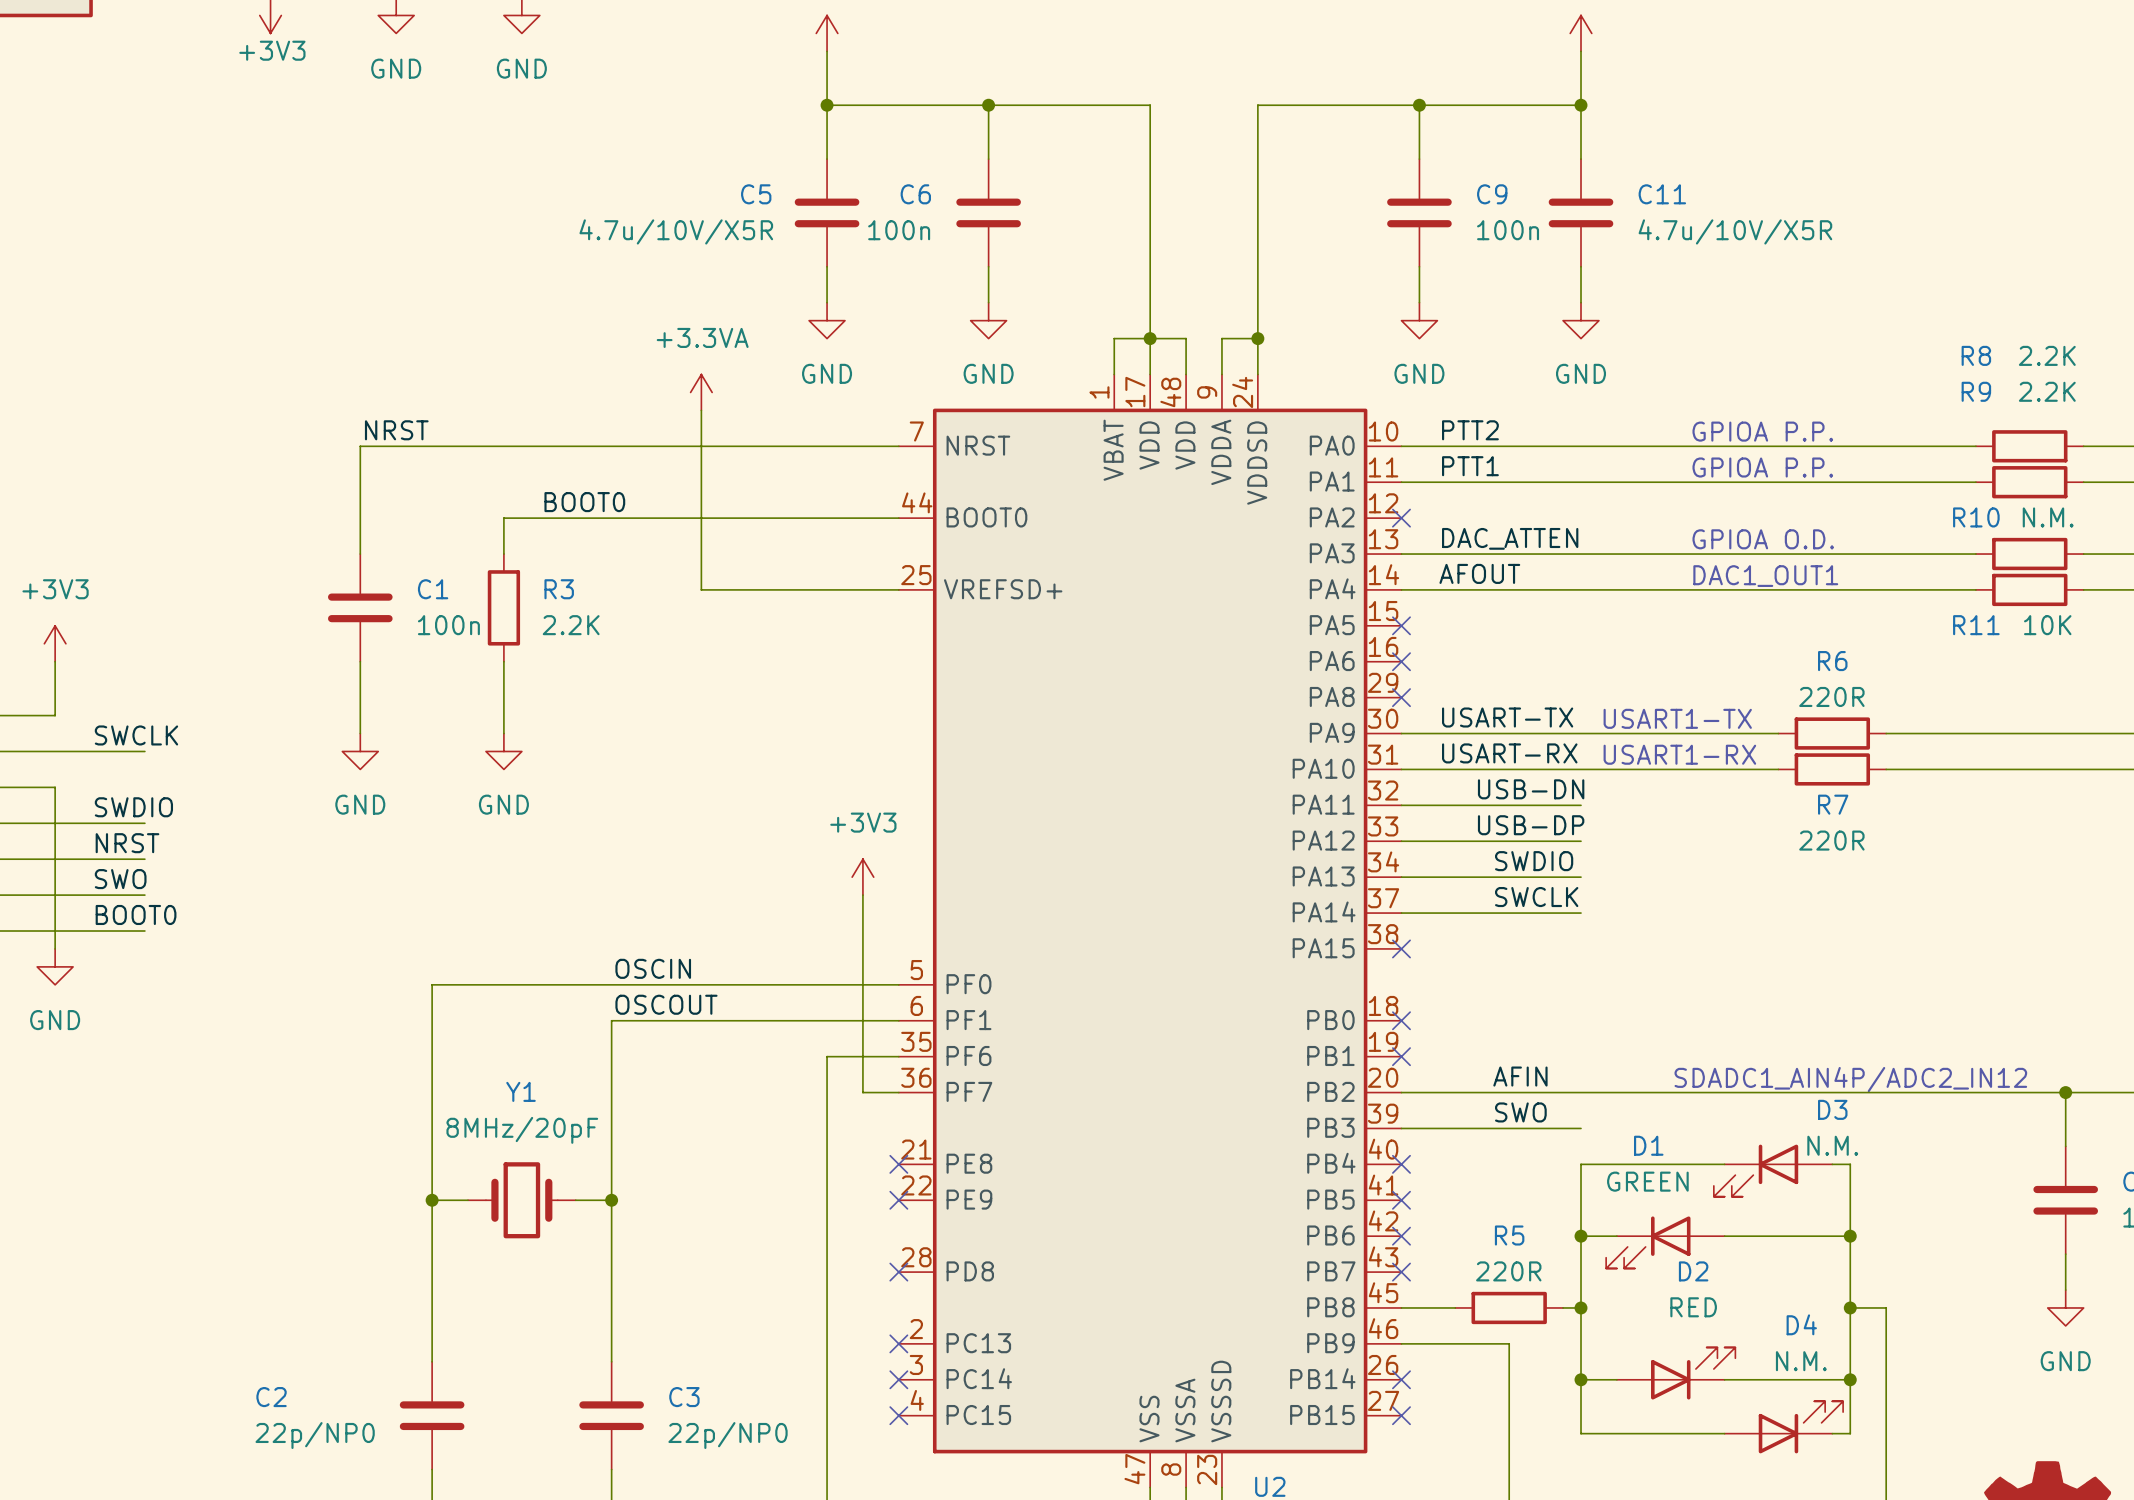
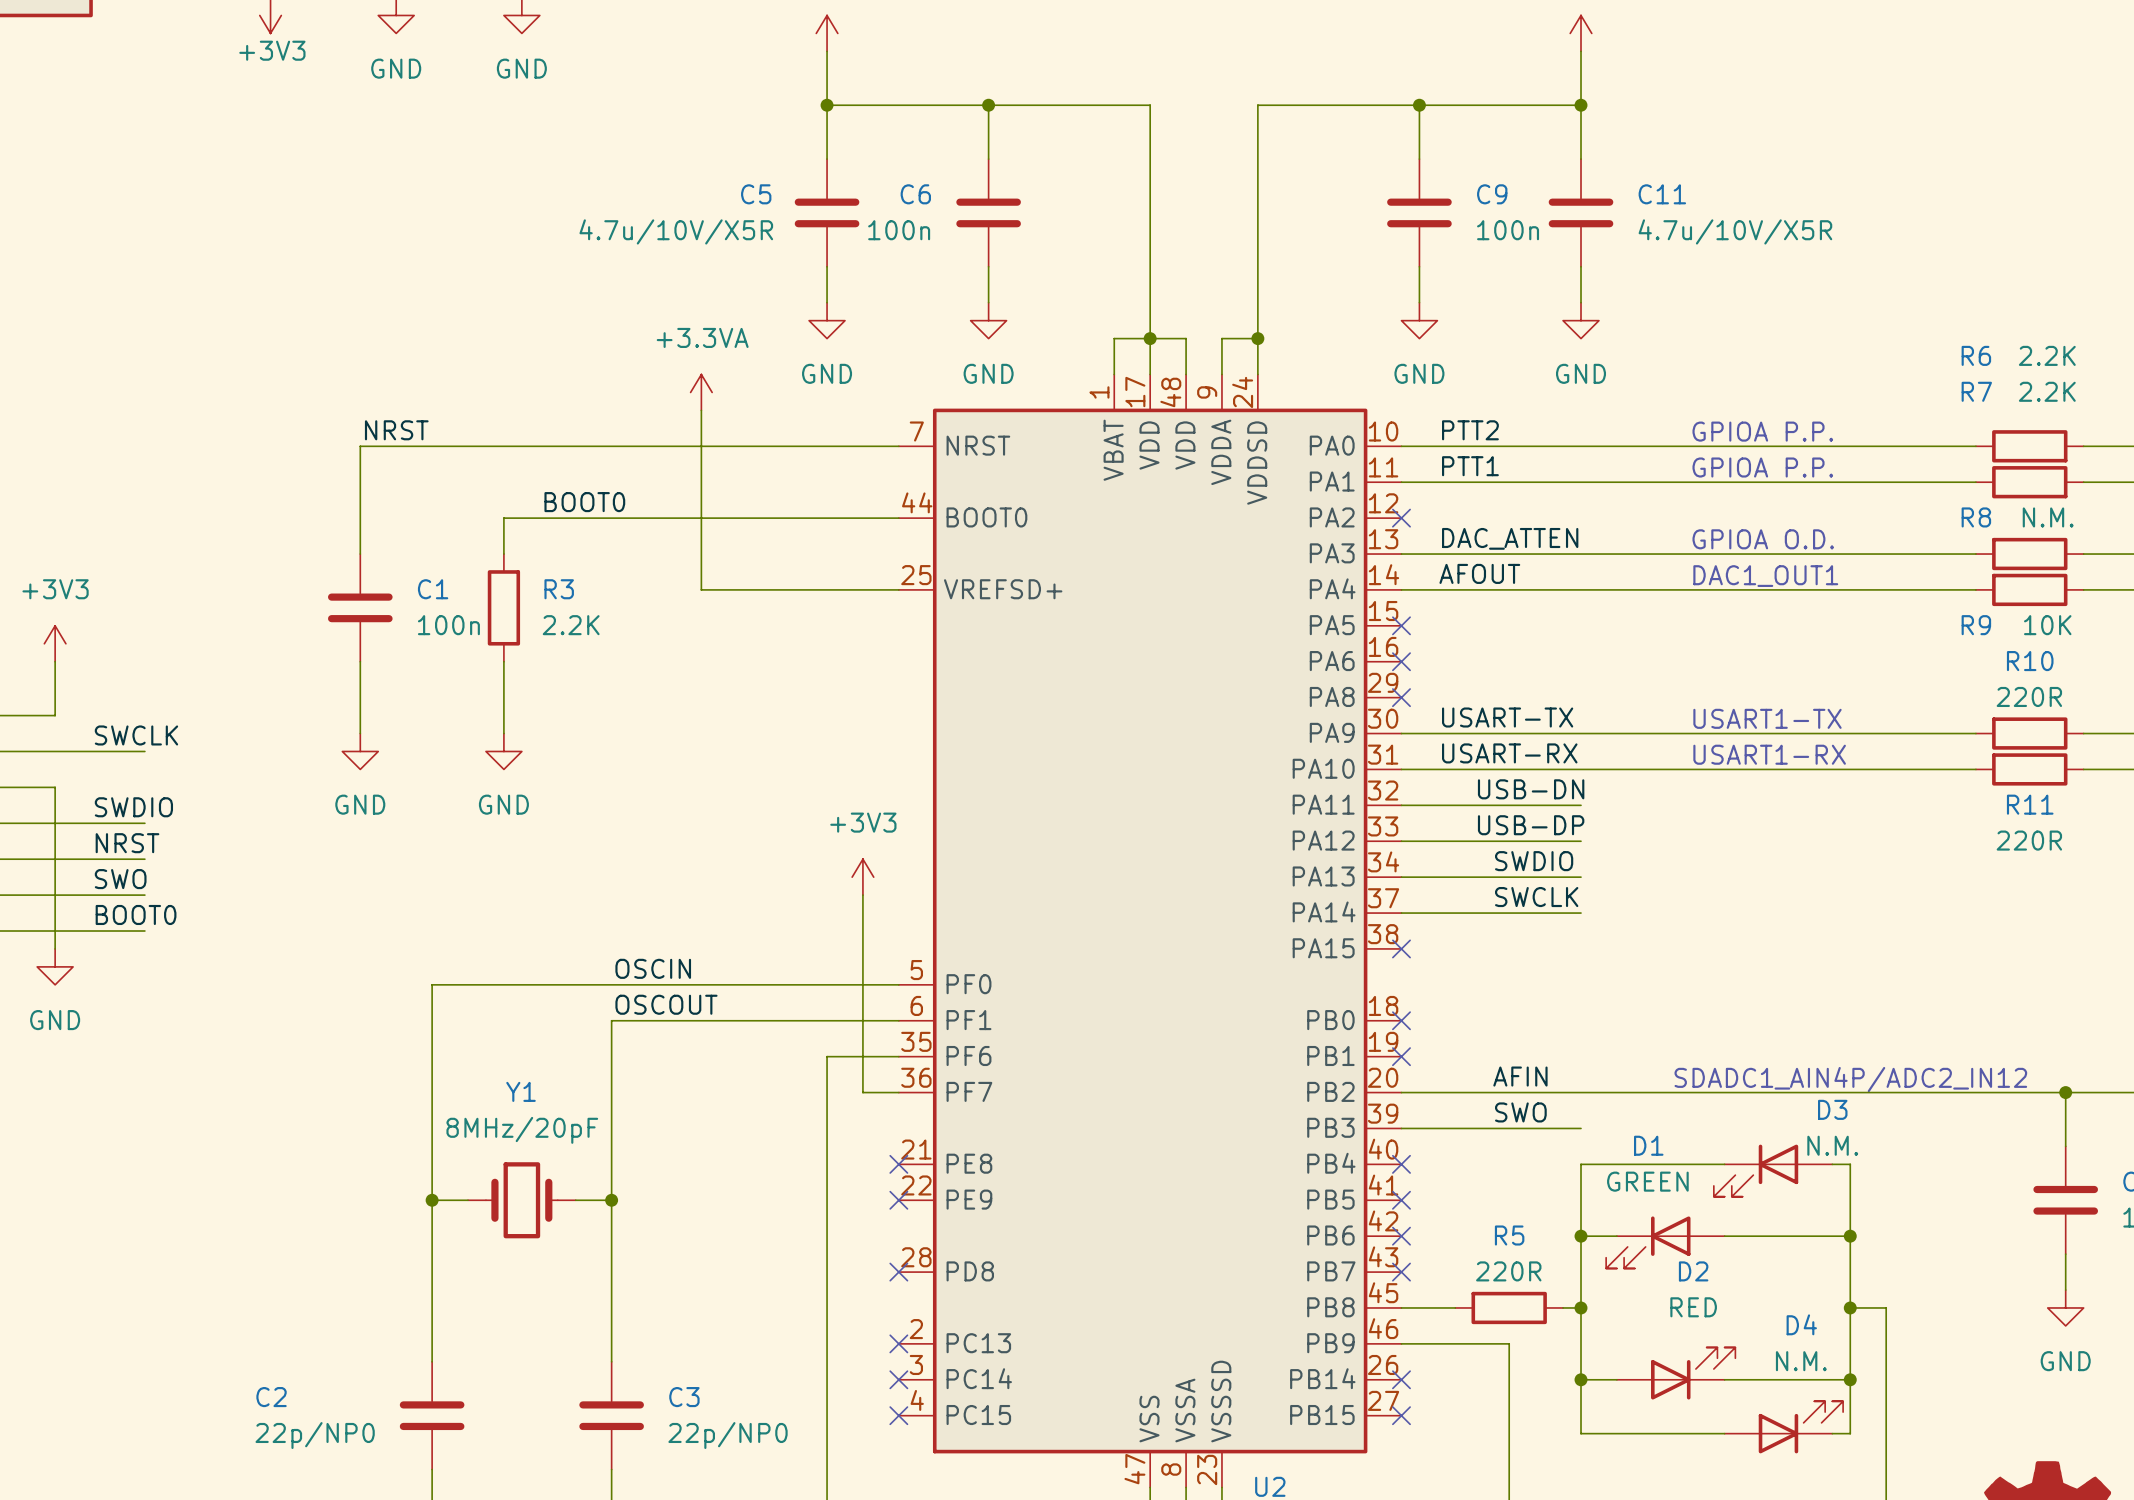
R8 name: R8 (1976, 355) -> R6 (1976, 355)
R9 name: R9 (1976, 391) -> R7 (1976, 391)
R10 name: R10 (1976, 517) -> R8 (1976, 517)
R11 name: R11 (1976, 625) -> R9 (1976, 625)
text position: USART1-TX (1677, 718) -> USART1-TX (1767, 718)
R6: 220R (1832, 733) -> none
wire: (1975, 733) (2083, 733) -> (1778, 733) (1886, 733)
R10: none -> 220R (2029, 733)
text position: USART1-RX (1679, 754) -> USART1-RX (1769, 754)
R7: 220R (1832, 769) -> none
wire: (1975, 769) (2083, 769) -> (1778, 769) (1886, 769)
R11: none -> 220R (2029, 769)

